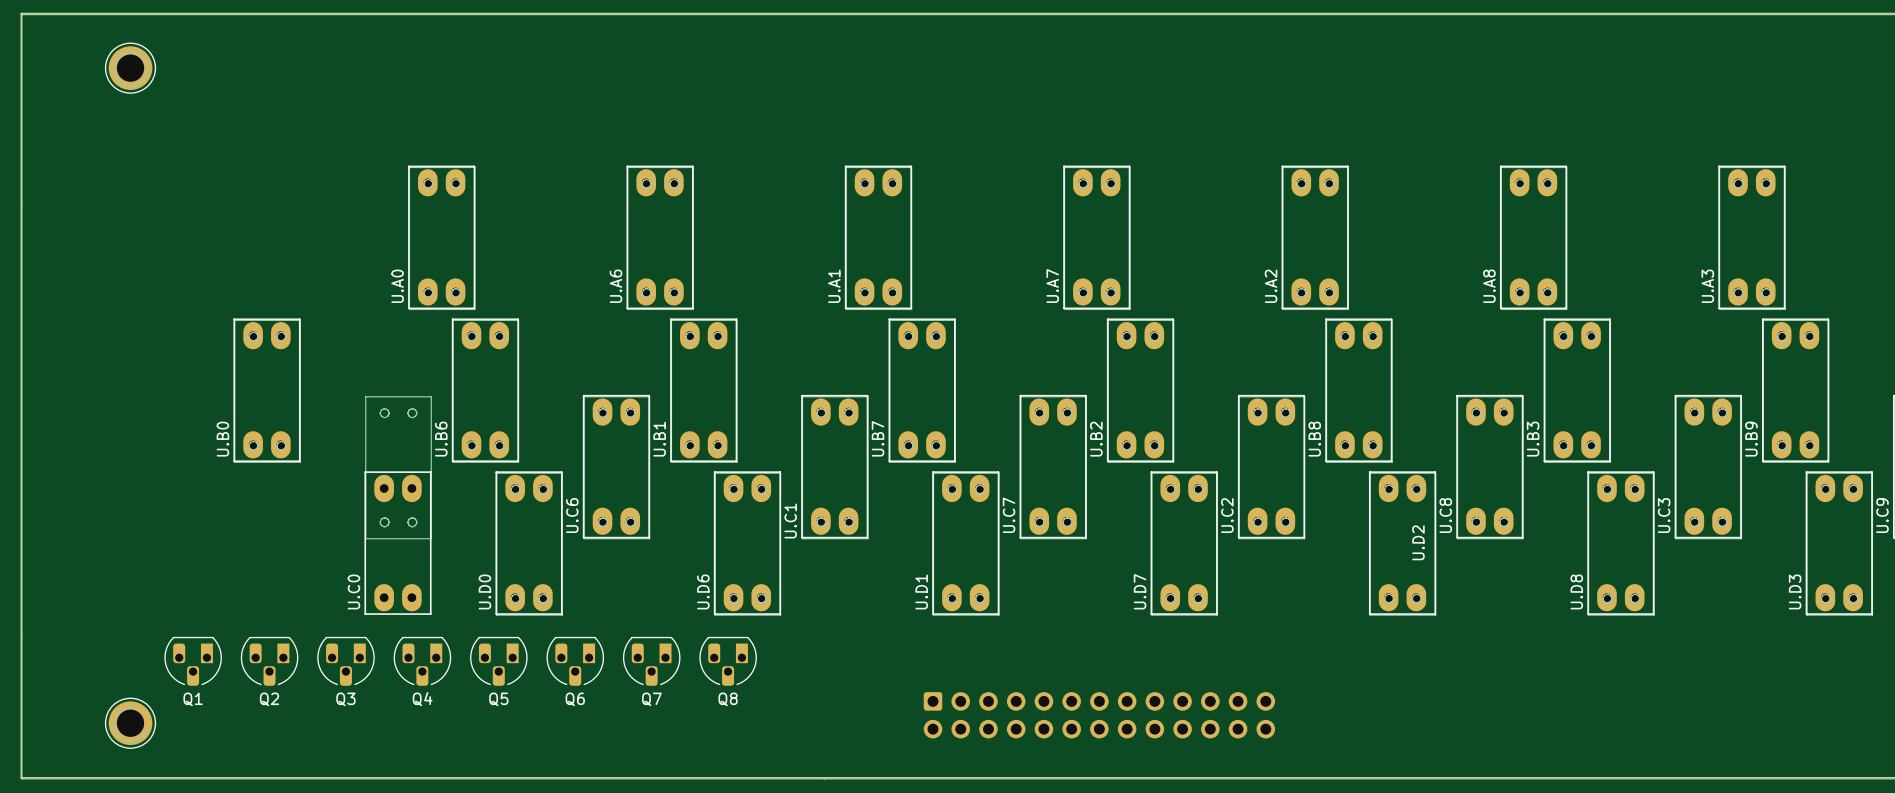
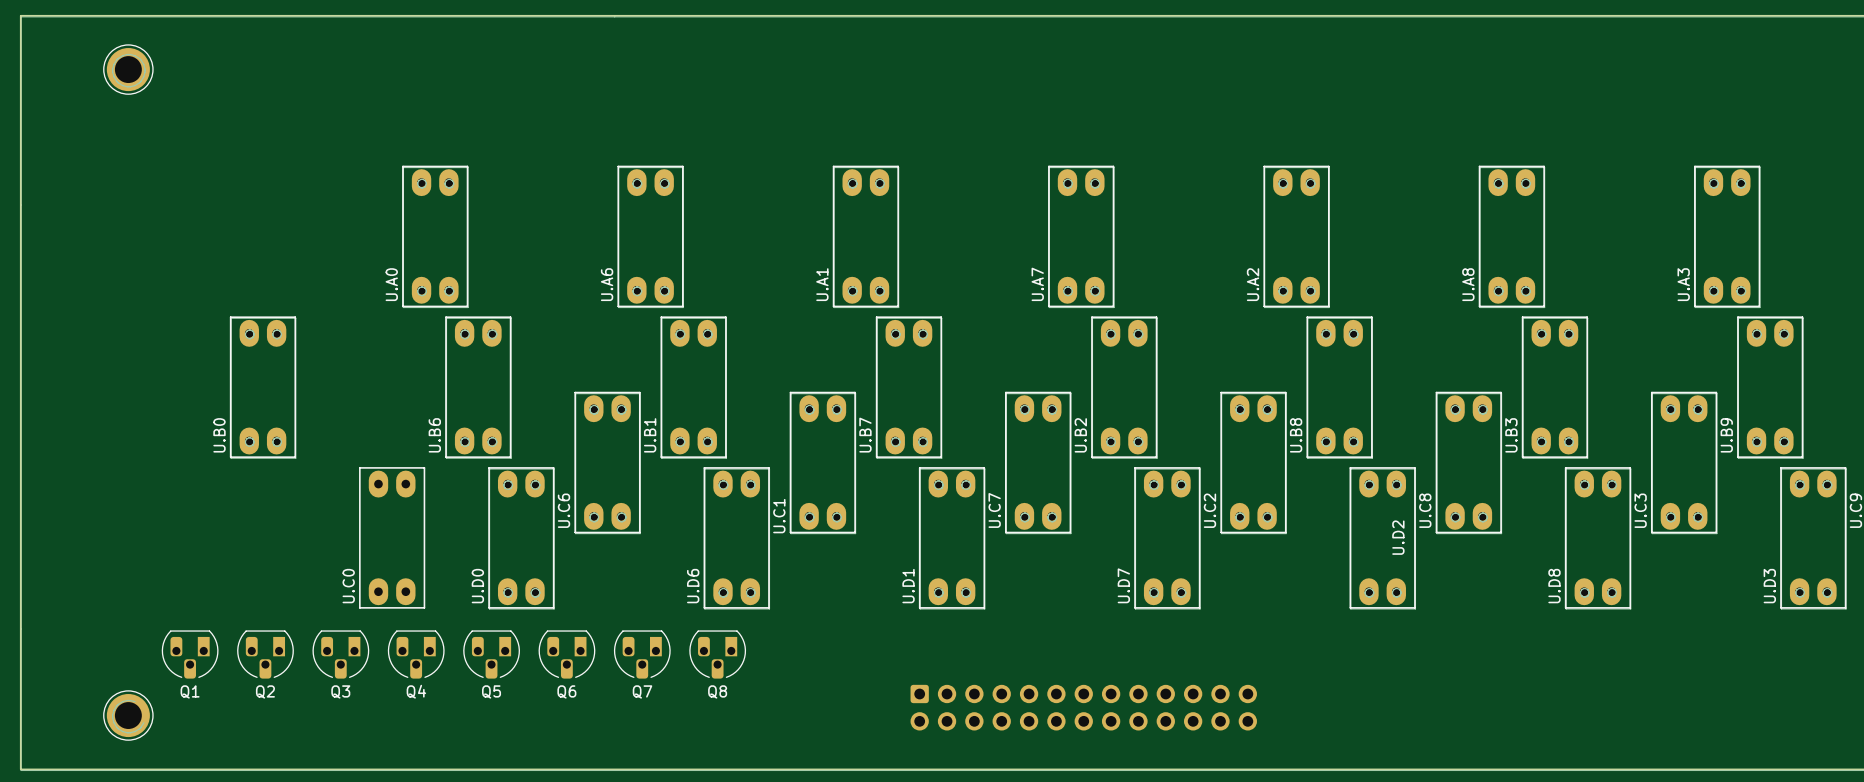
line: (365, 396) (365, 538) (431, 538) (431, 396) (365, 396) -> none
line: (383, 408) (389, 412) (385, 417) (380, 413) (383, 408) -> none
line: (411, 408) (416, 412) (413, 417) (408, 413) (411, 408) -> none
line: (383, 517) (389, 521) (385, 526) (380, 523) (383, 517) -> none
line: (411, 517) (416, 521) (413, 526) (408, 523) (411, 517) -> none

